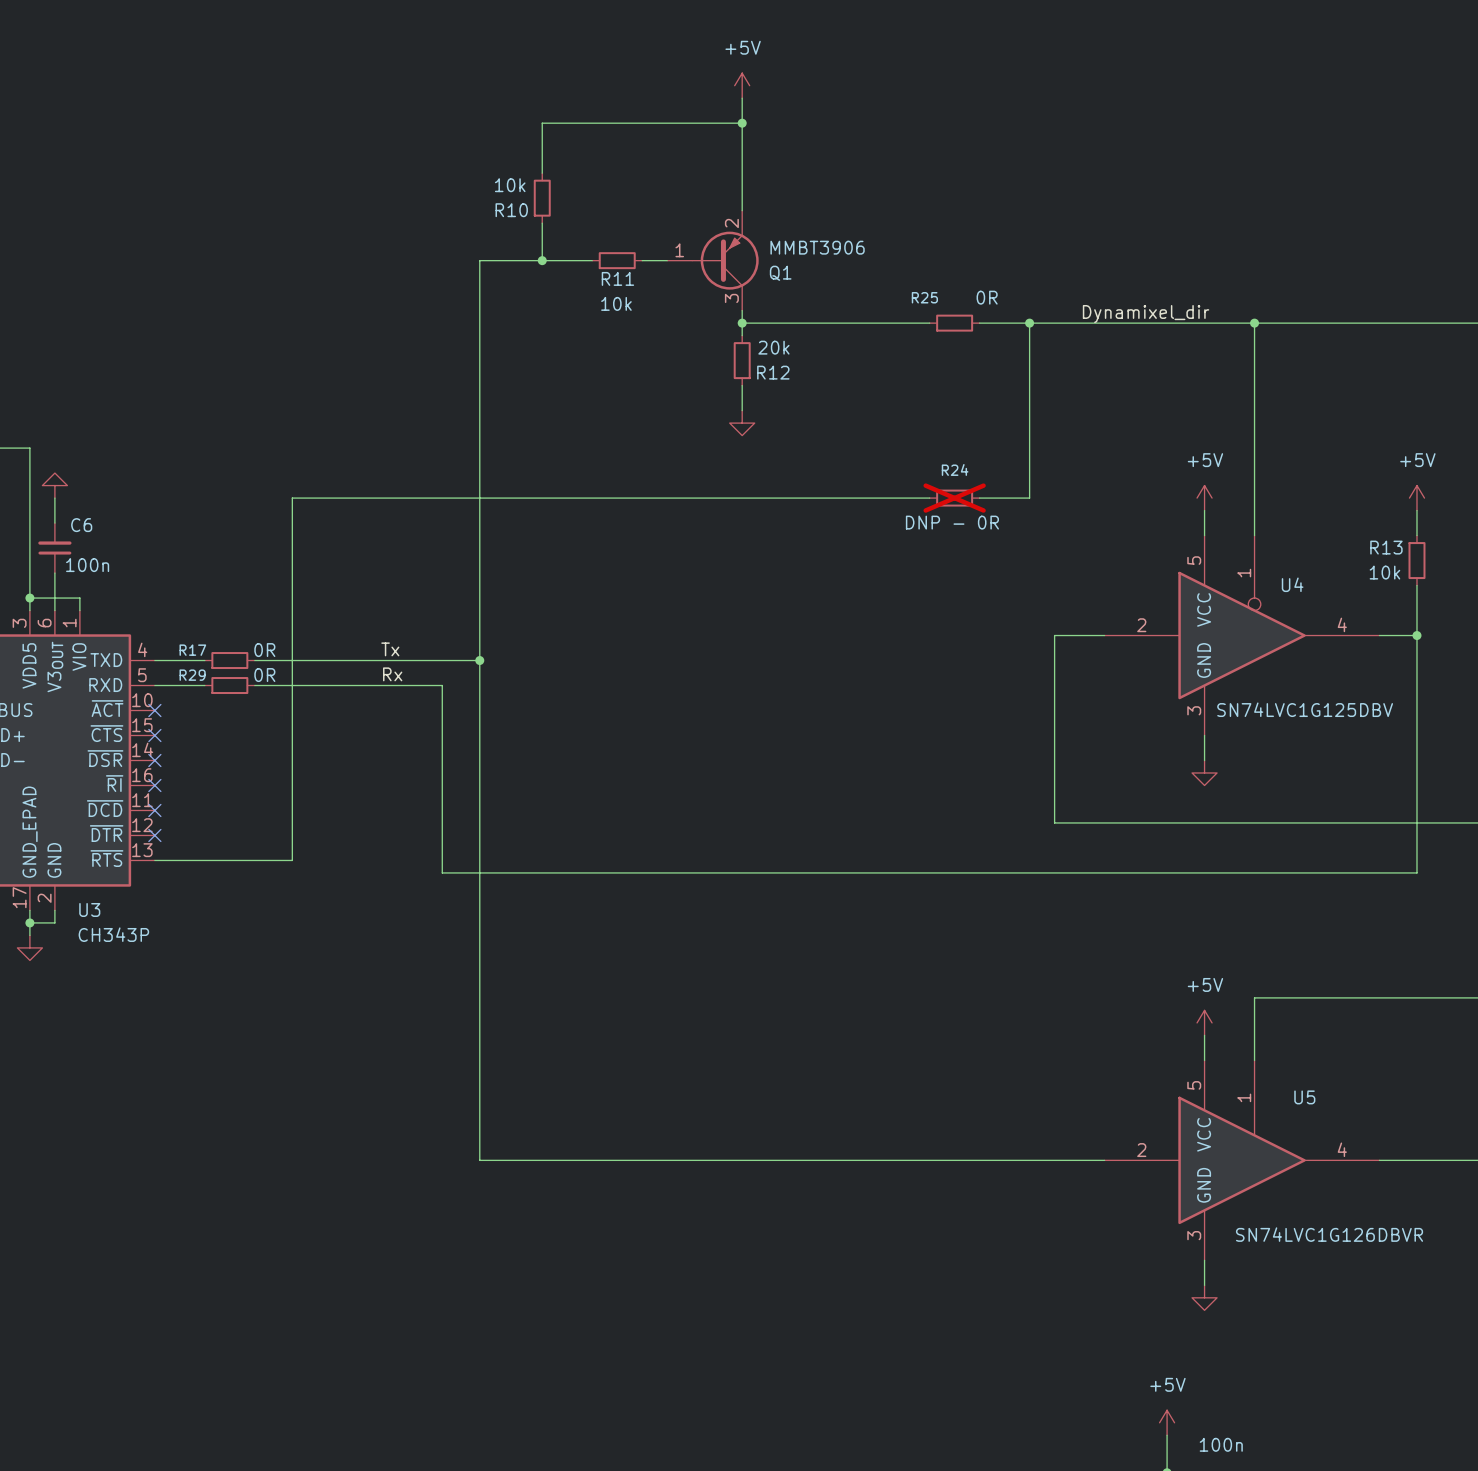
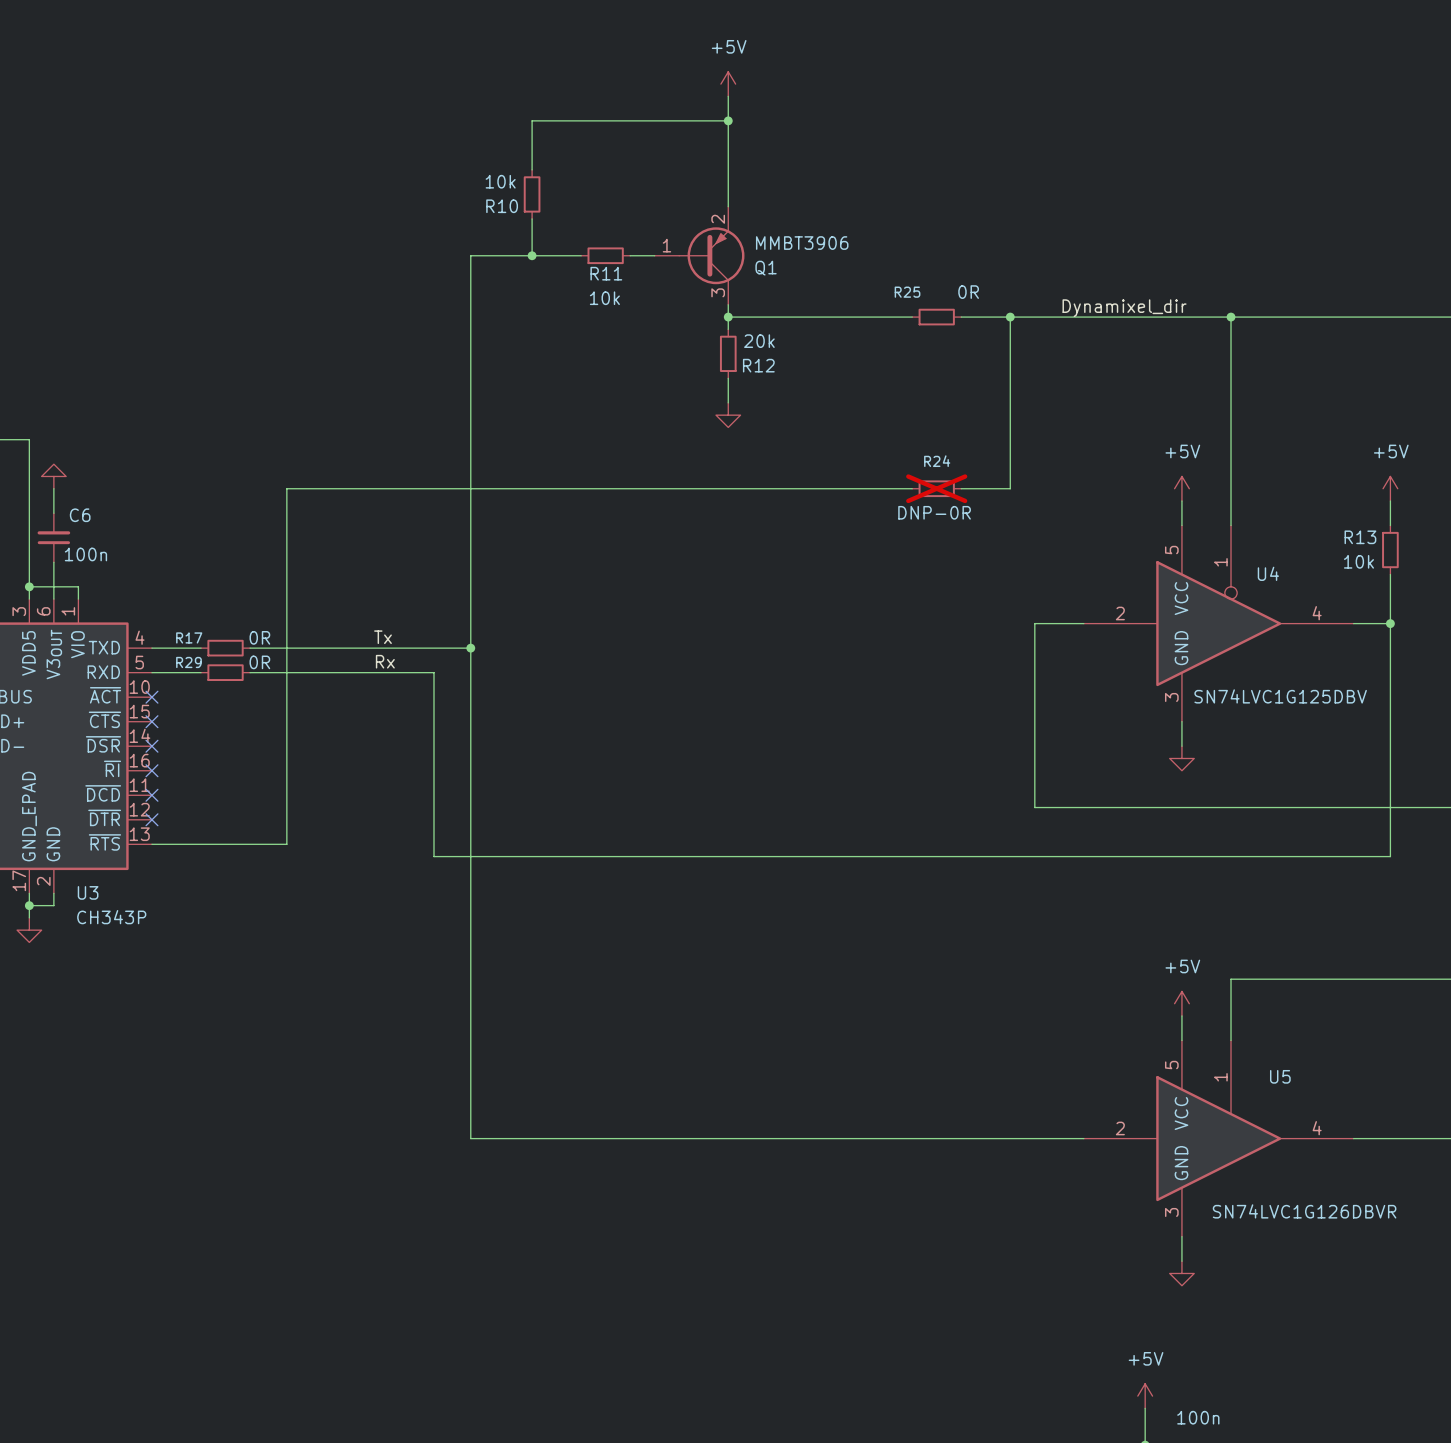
R24 value: DNP - 0R (952, 522) -> DNP-0R (934, 512)

